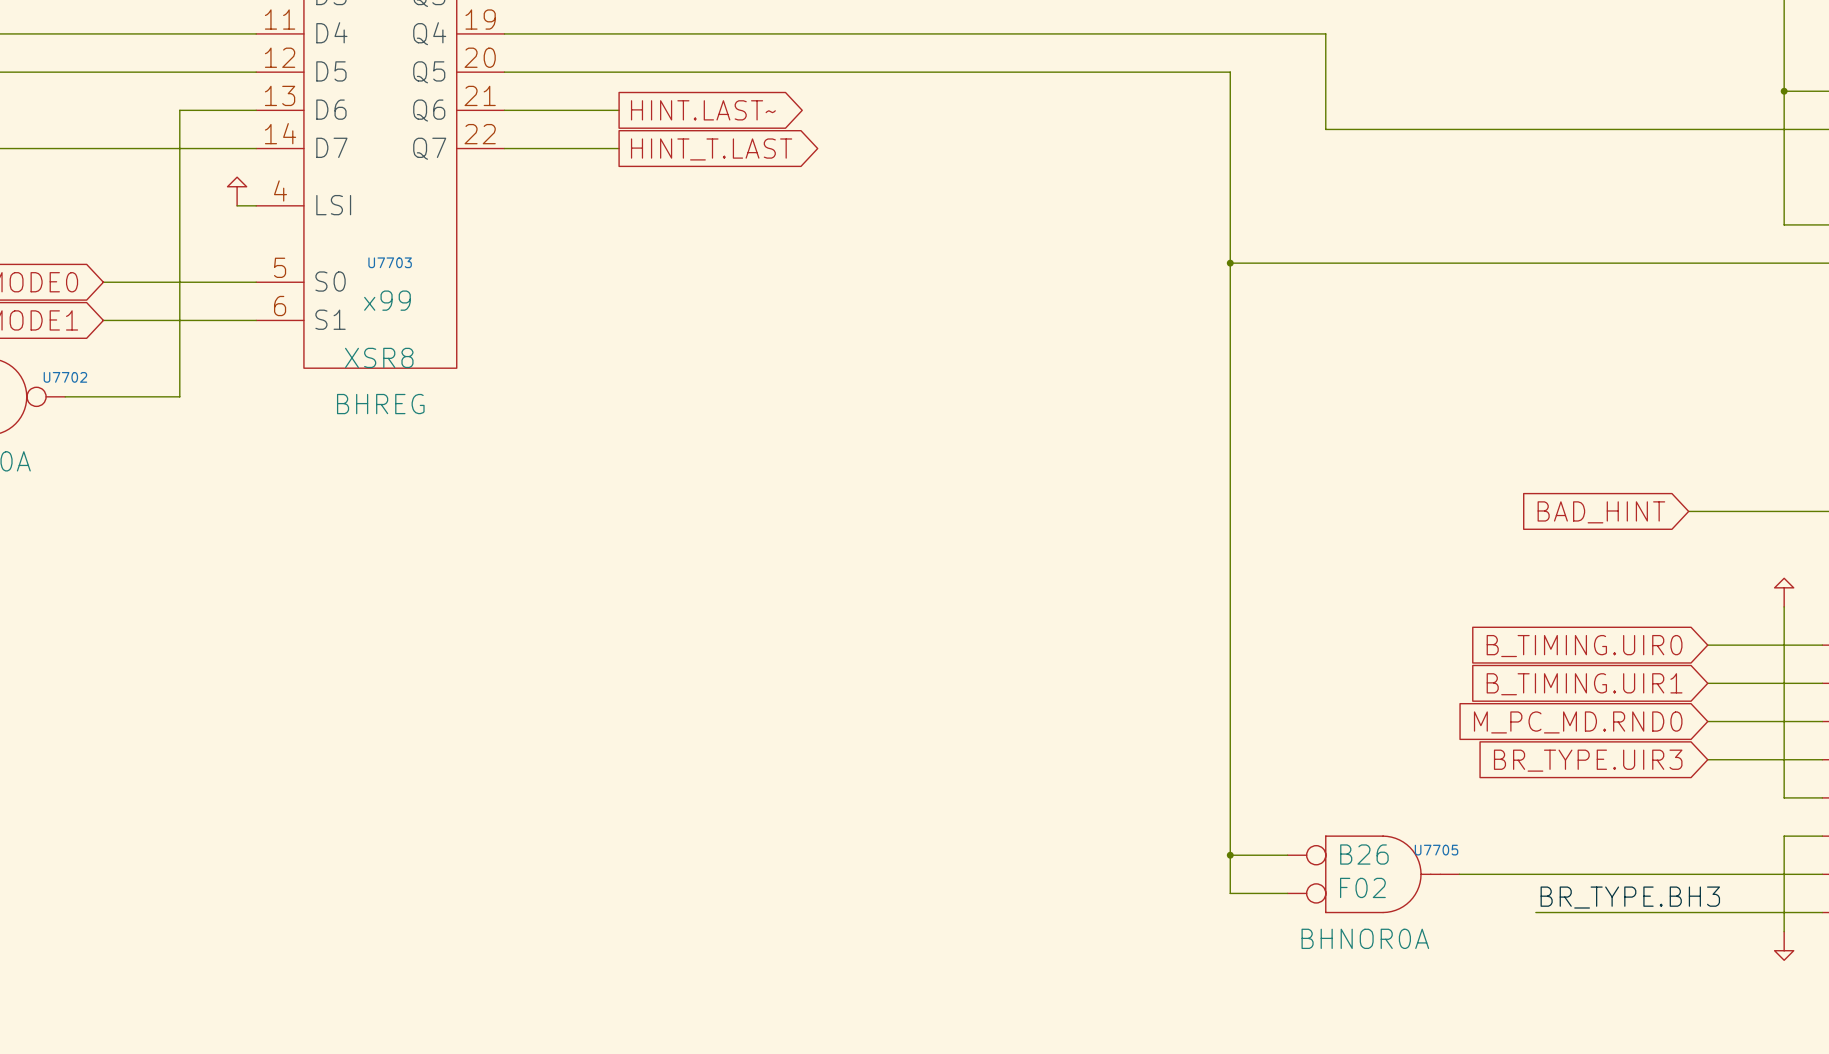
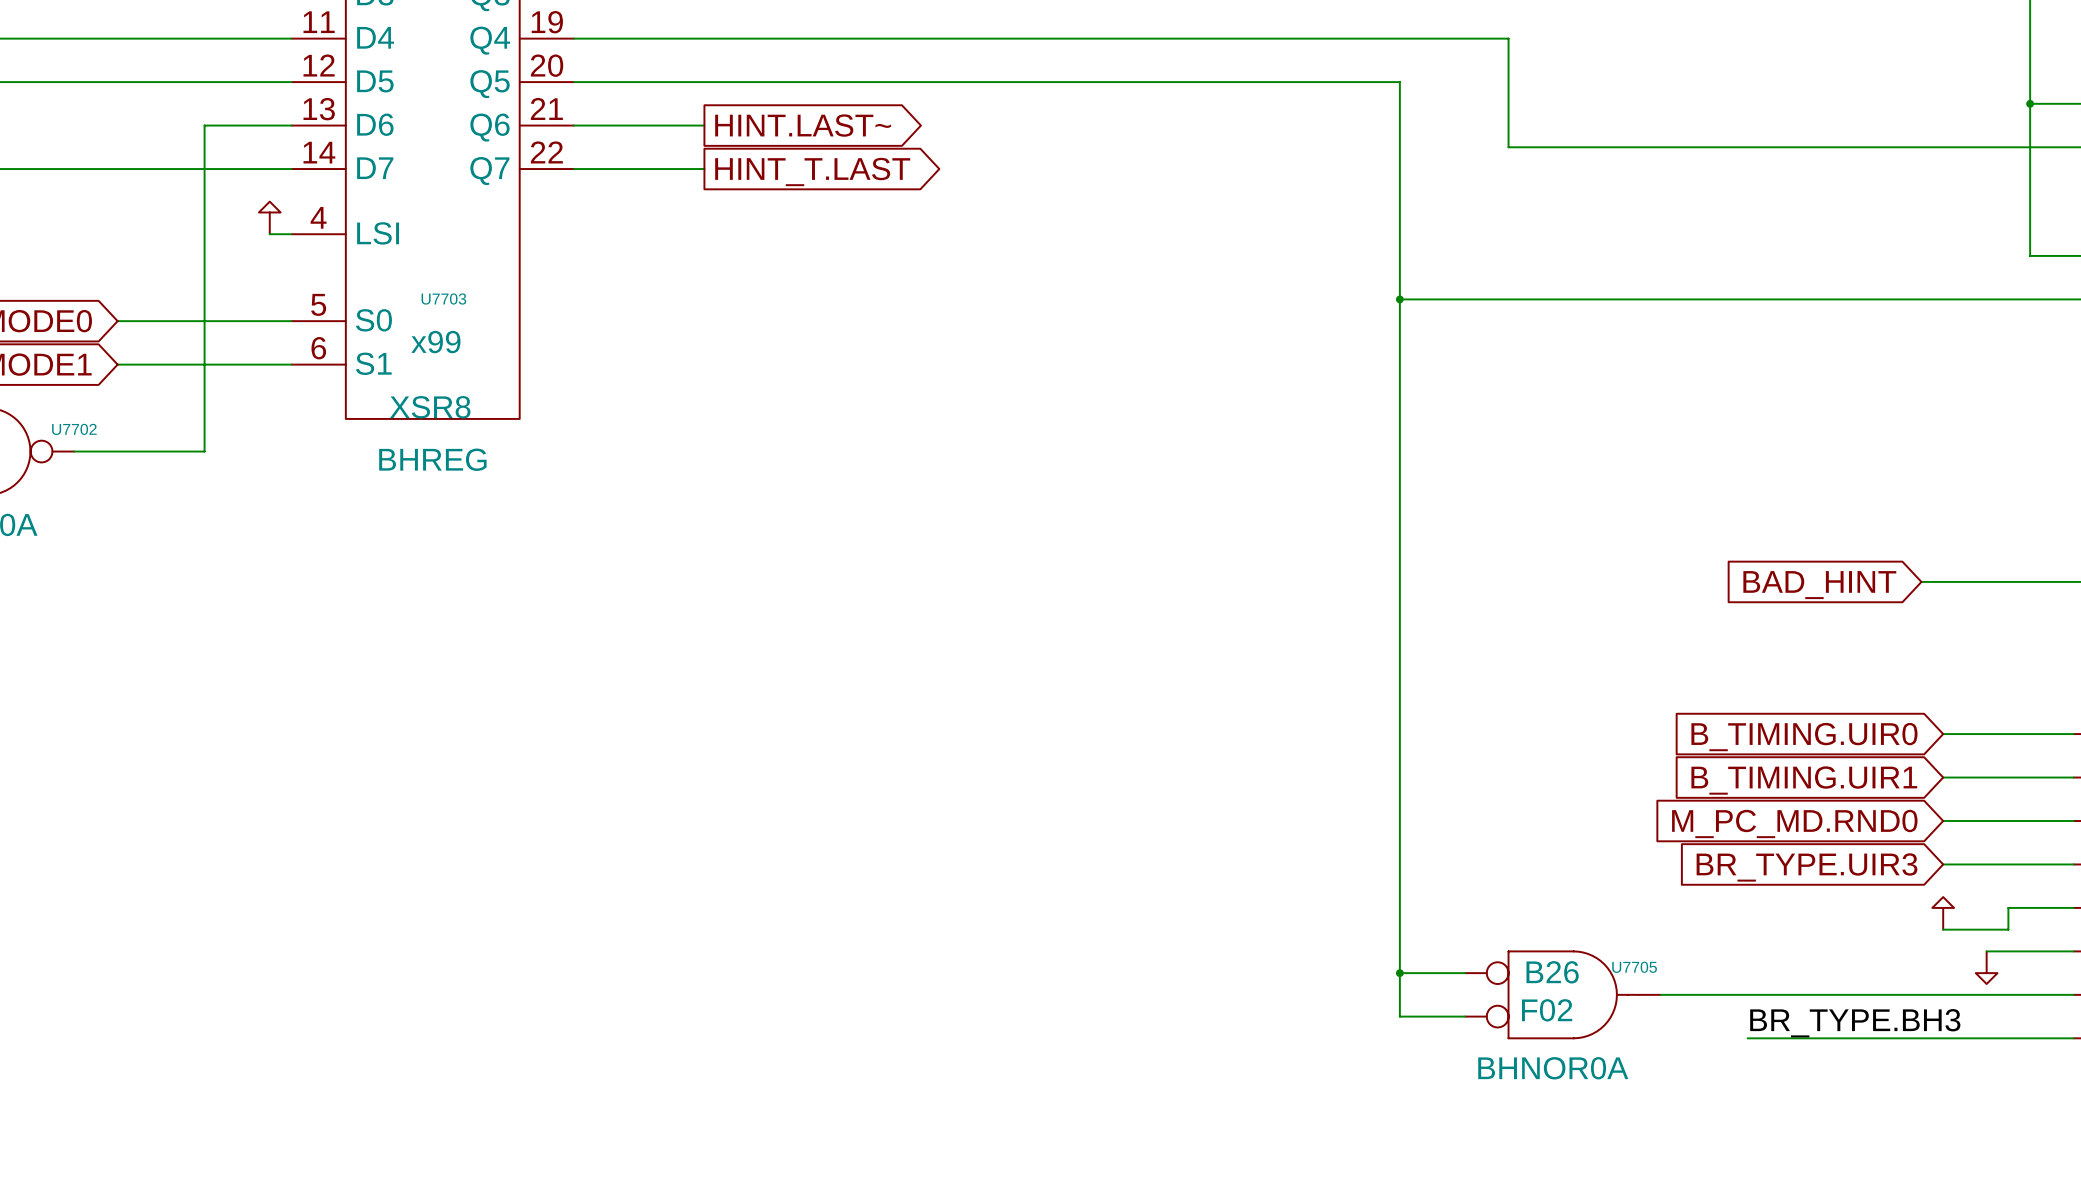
power symbol: (1784, 592) -> none
wire: (1784, 606) (1784, 797) -> (1943, 929) (2008, 929) (2008, 907) (2030, 907)
power symbol: none -> (1943, 913)
wire: (1784, 836) (1784, 931) -> (2030, 951) (1986, 951)
power symbol: none -> (1986, 968)
power symbol: (1784, 946) -> none

